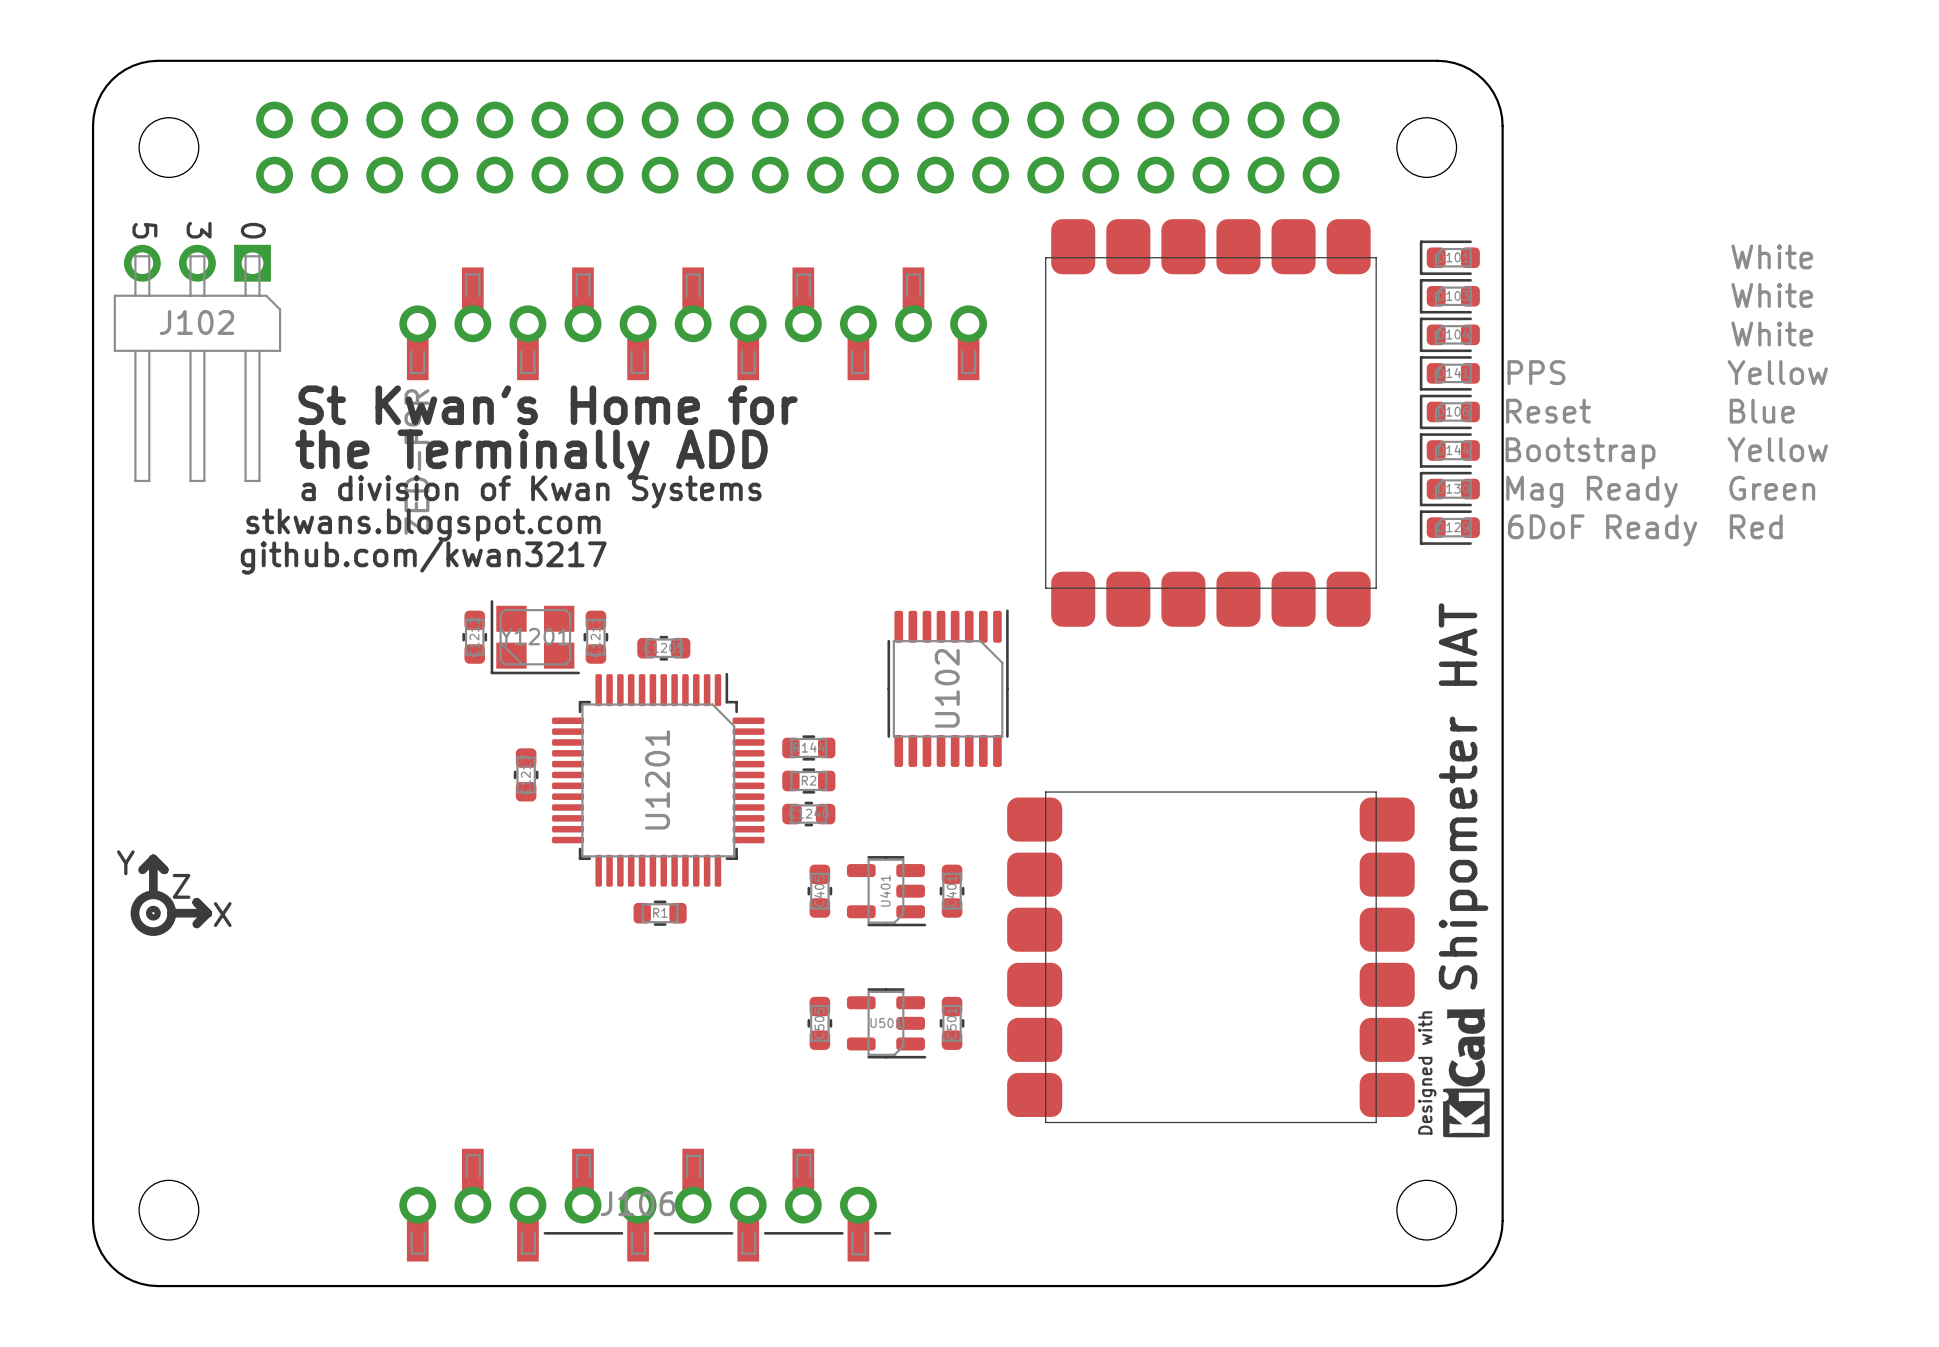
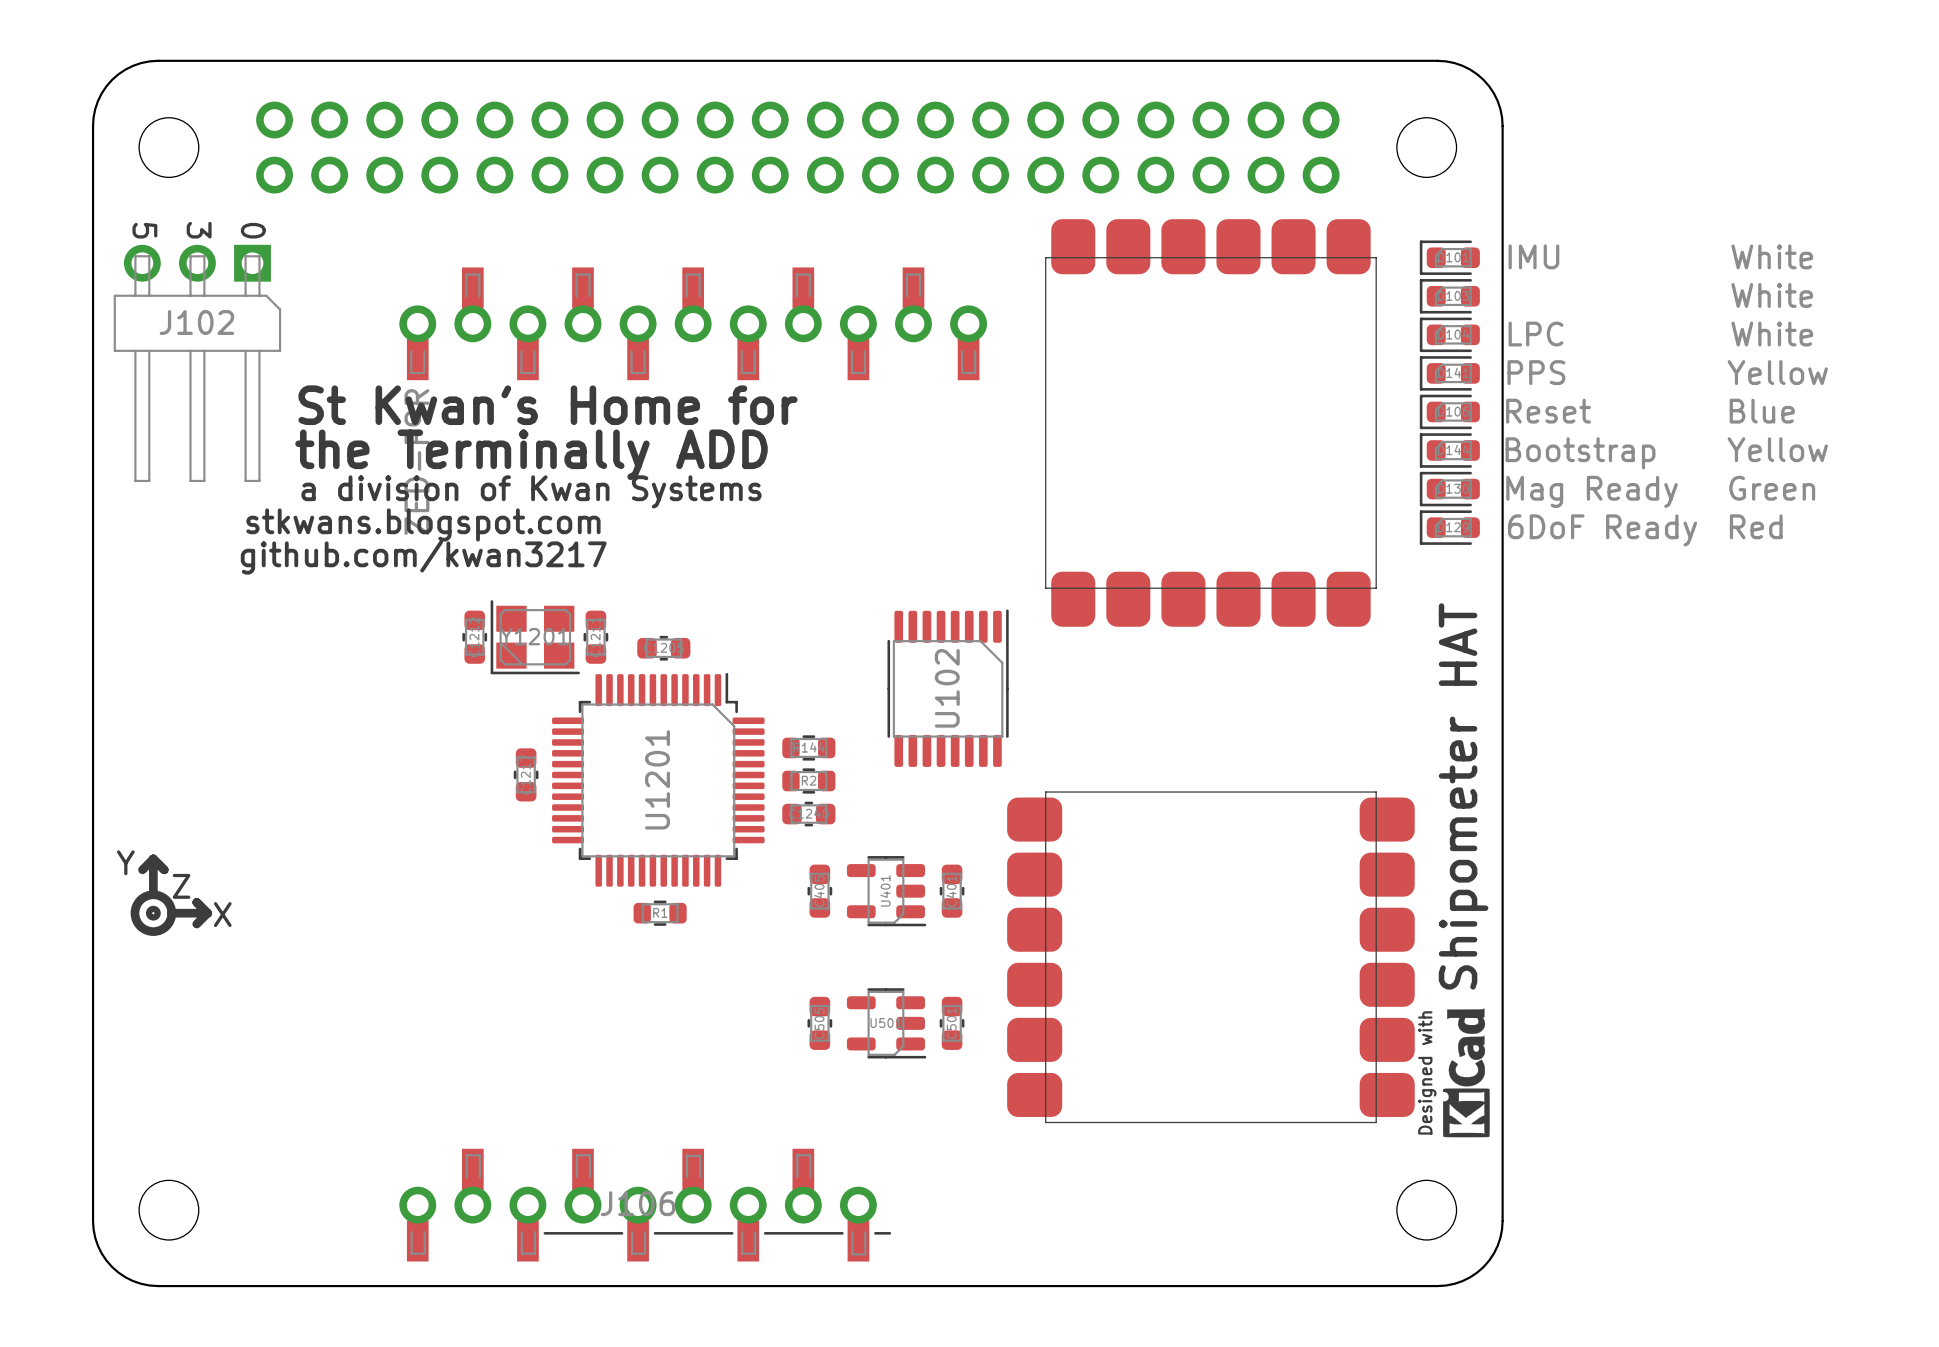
part text: none -> IMU (1533, 256)
part text: none -> LPC (1535, 334)

